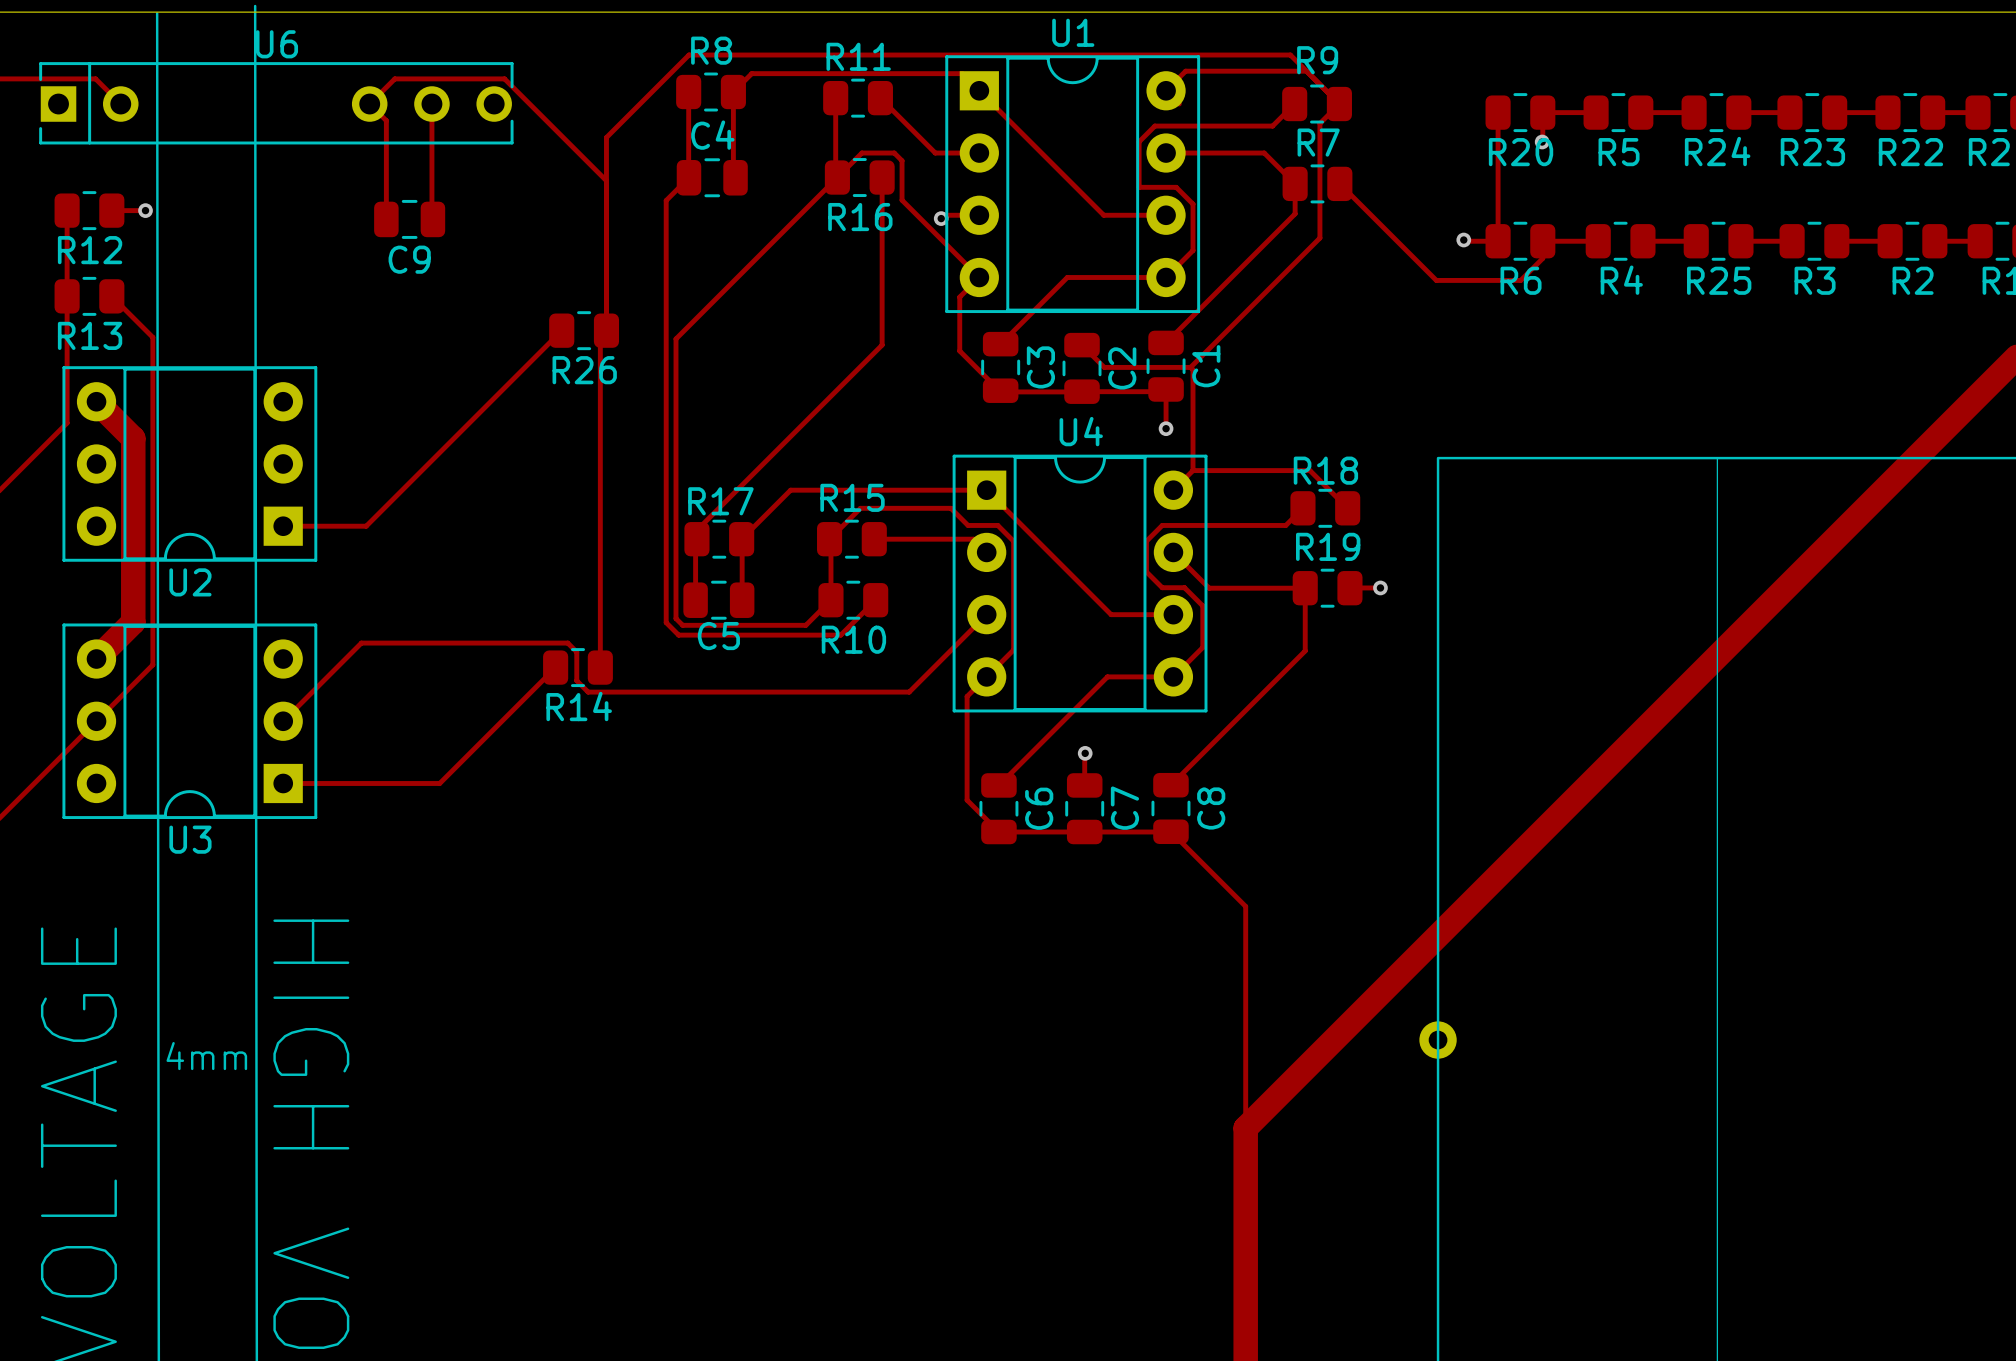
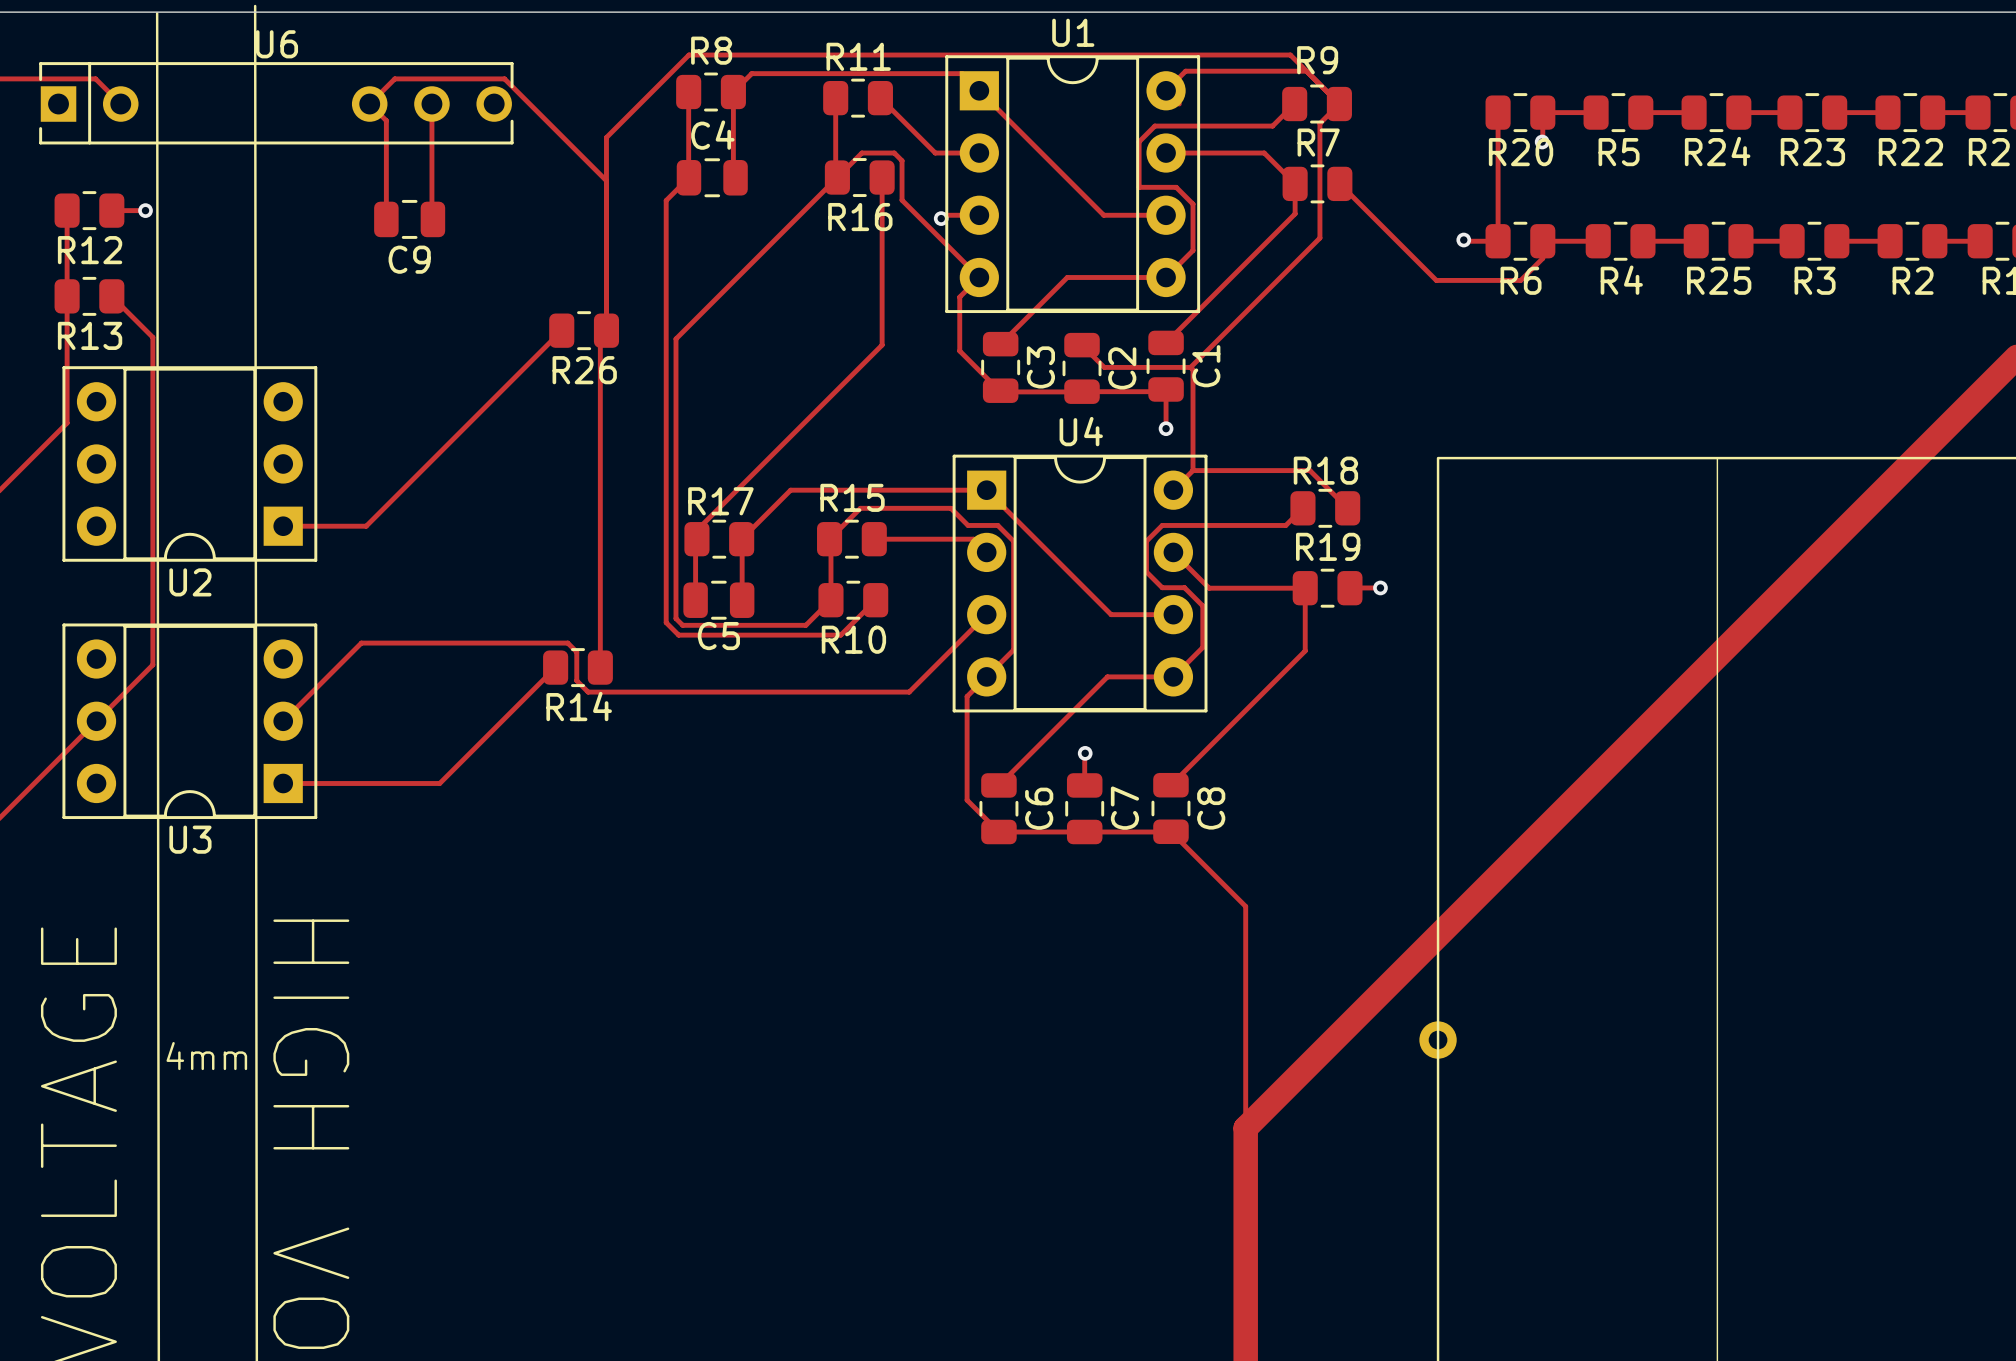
track: (96, 401) (133, 438) (133, 622) (96, 659) -> none

